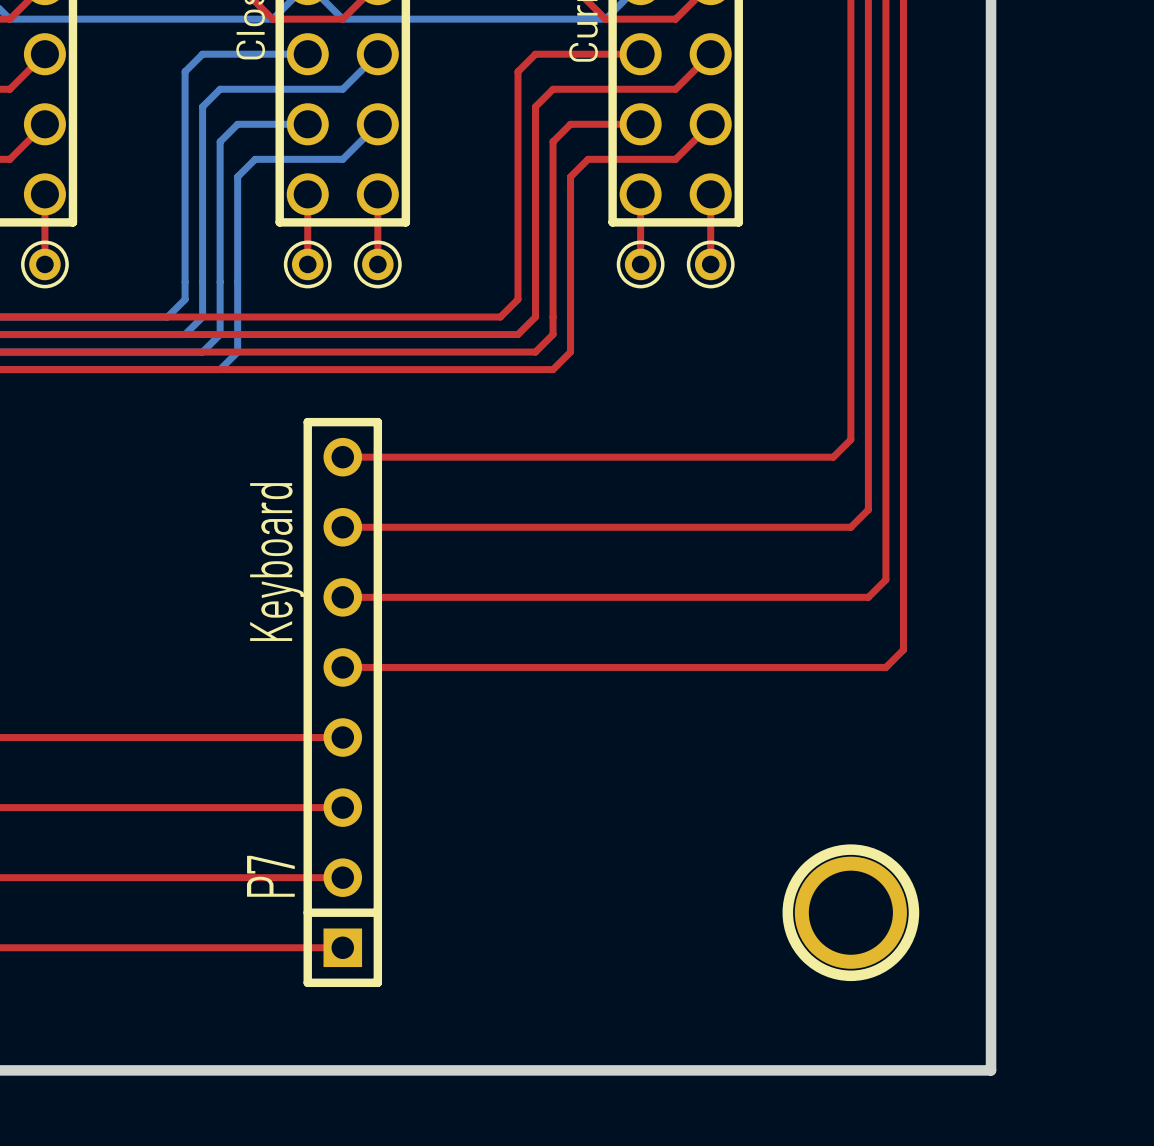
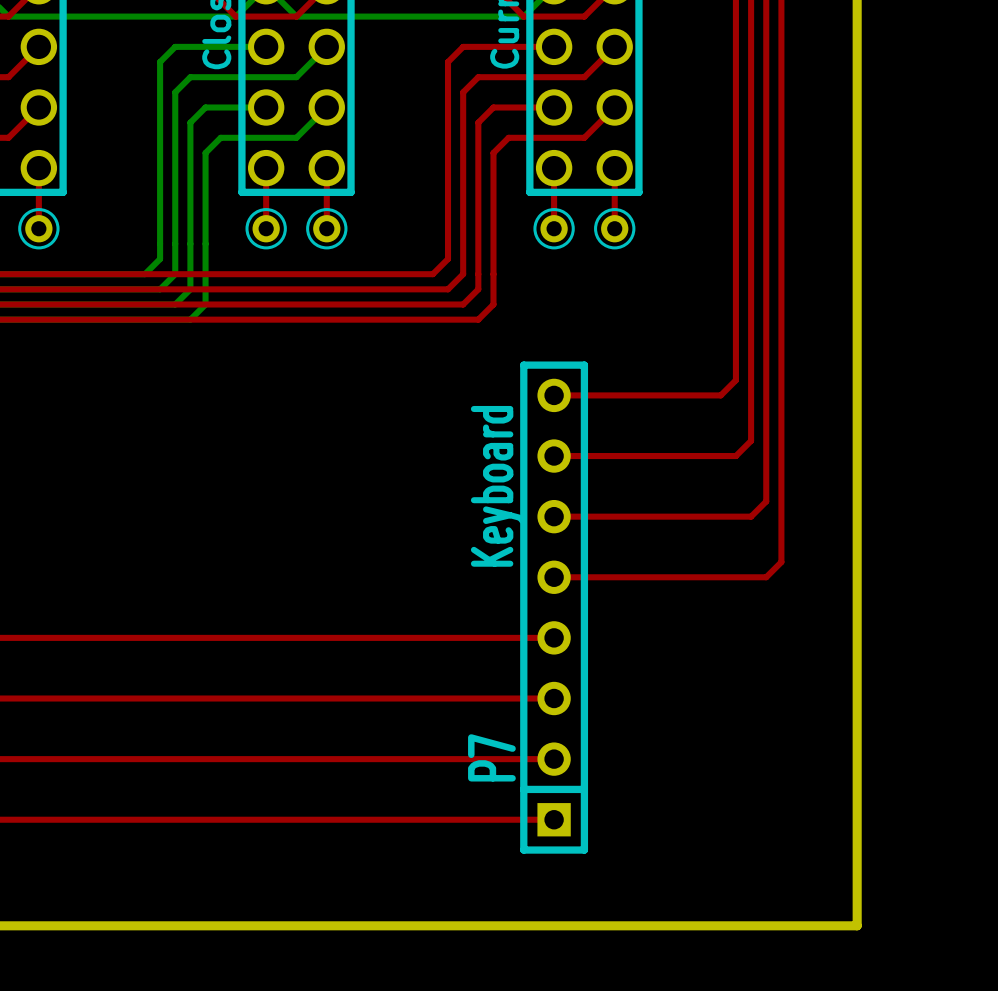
top track: (342, 457) (640, 457) -> (296, 637) (554, 637)
top track: (342, 527) (640, 527) -> (296, 698) (554, 698)
top track: (342, 597) (640, 597) -> (296, 759) (554, 759)
top track: (342, 667) (640, 667) -> (296, 819) (554, 819)
P7 position: (342, 702) -> (554, 607)
part: (850, 912) -> none

